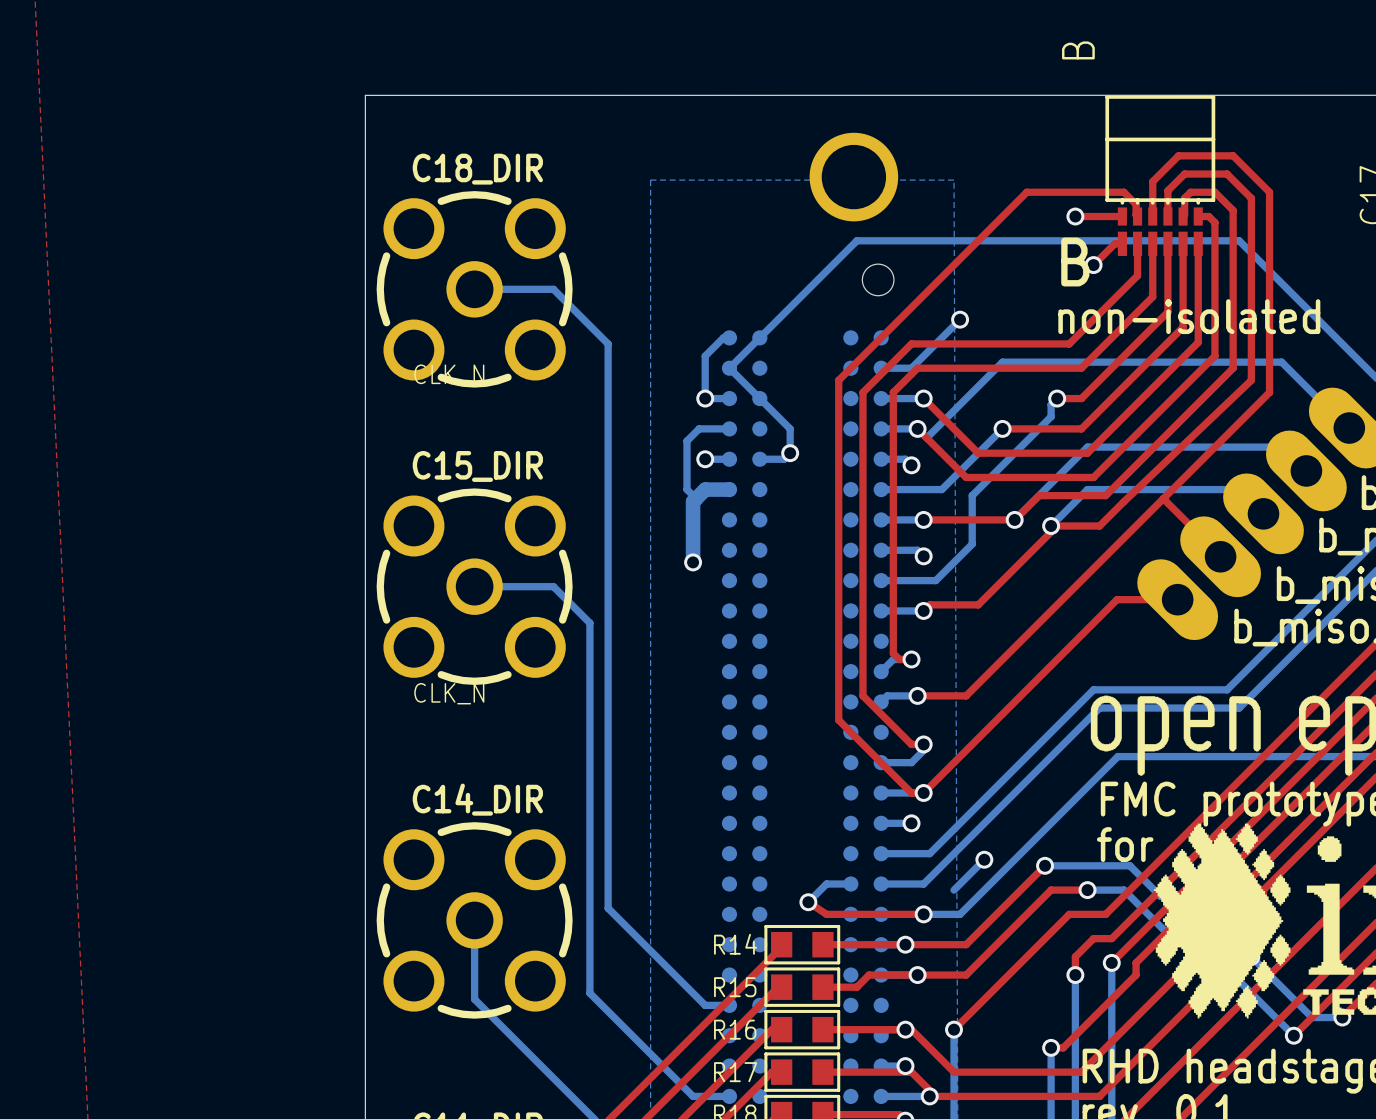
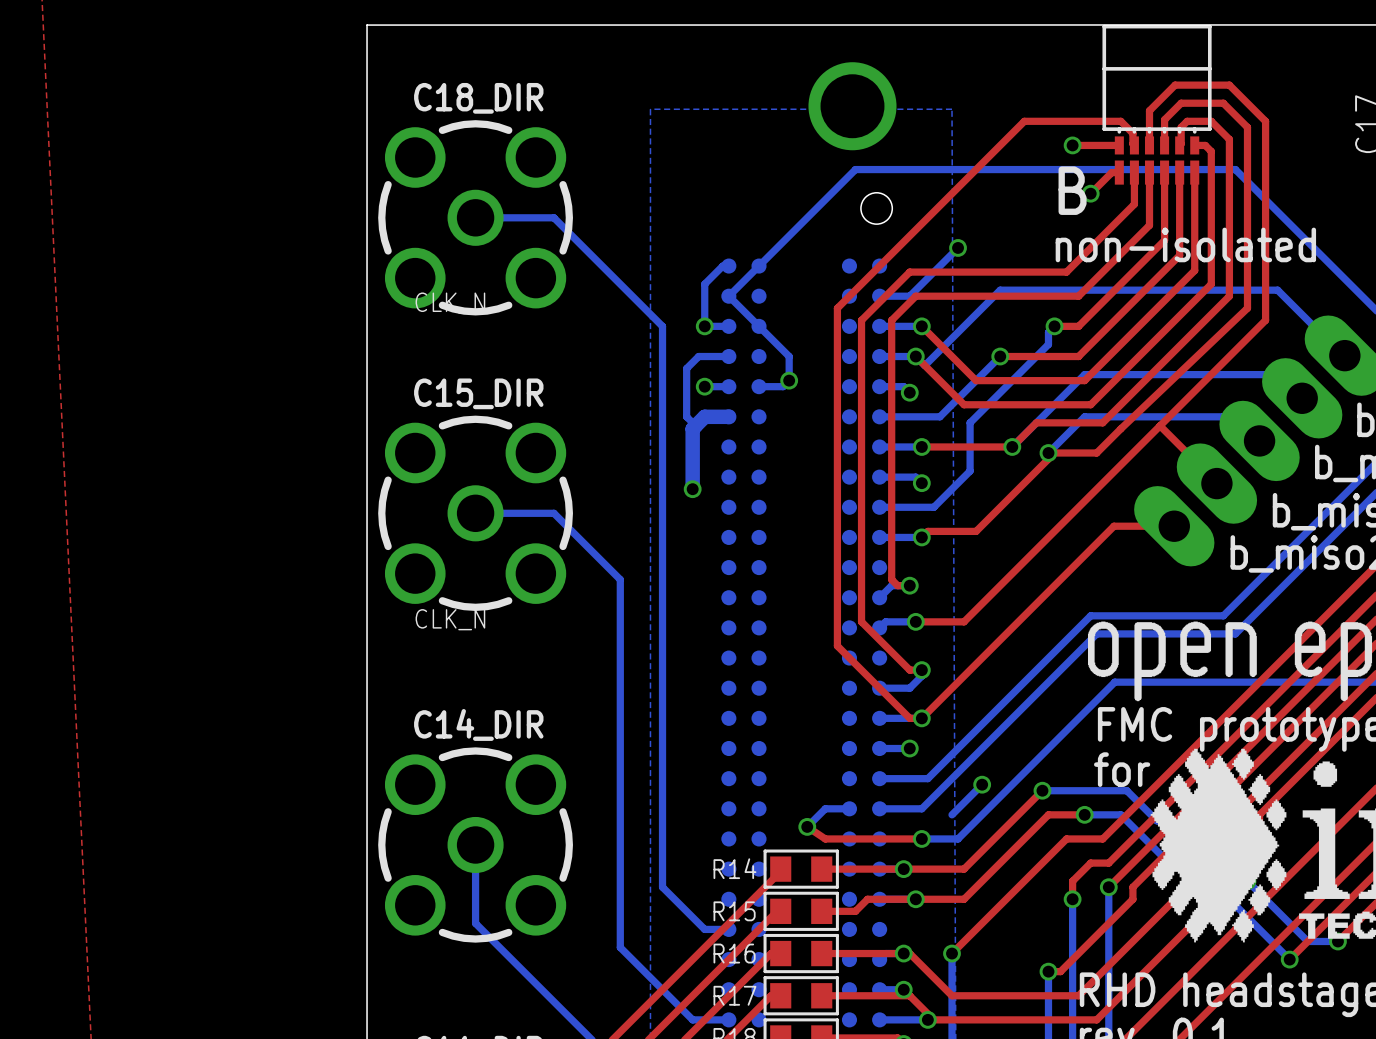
bottom track: (608, 343) (608, 908) (662, 962) -> (608, 272) (662, 326) (662, 887)
bottom track: (589, 623) (589, 993) (620, 1023) -> (590, 549) (620, 579) (620, 947)

